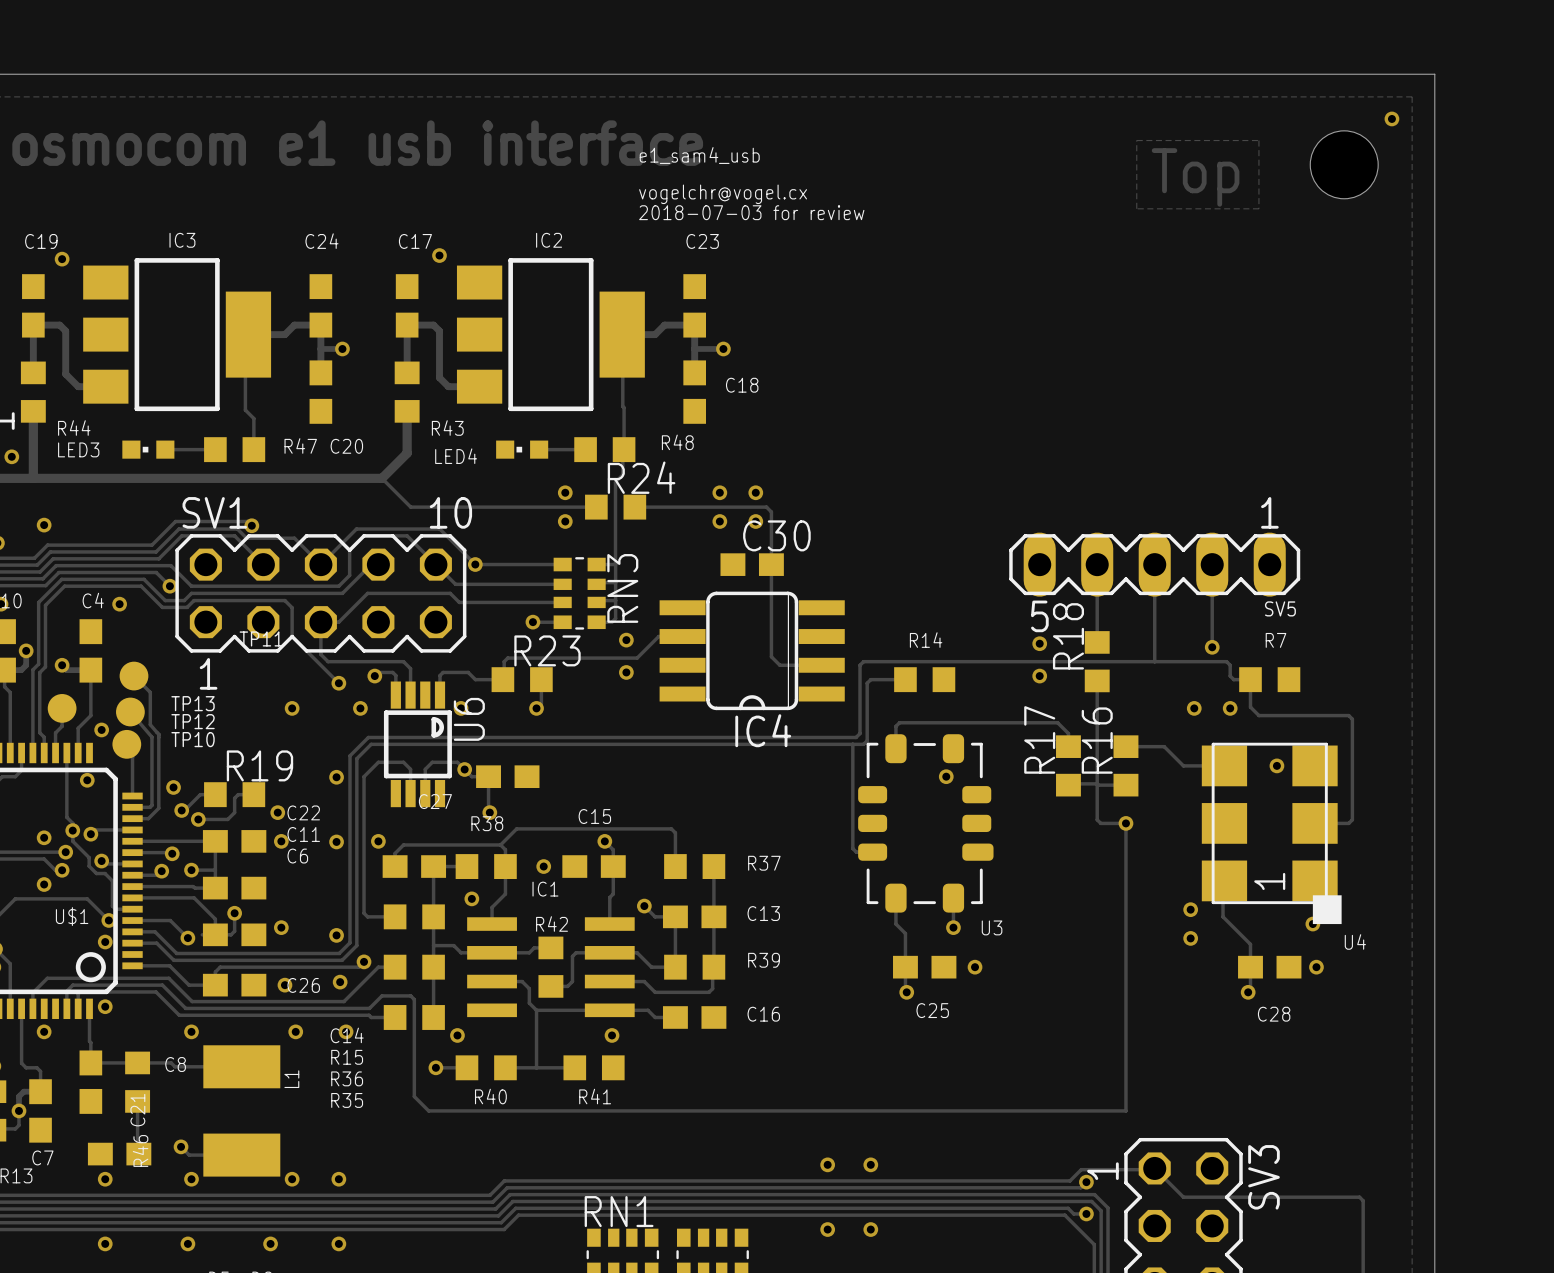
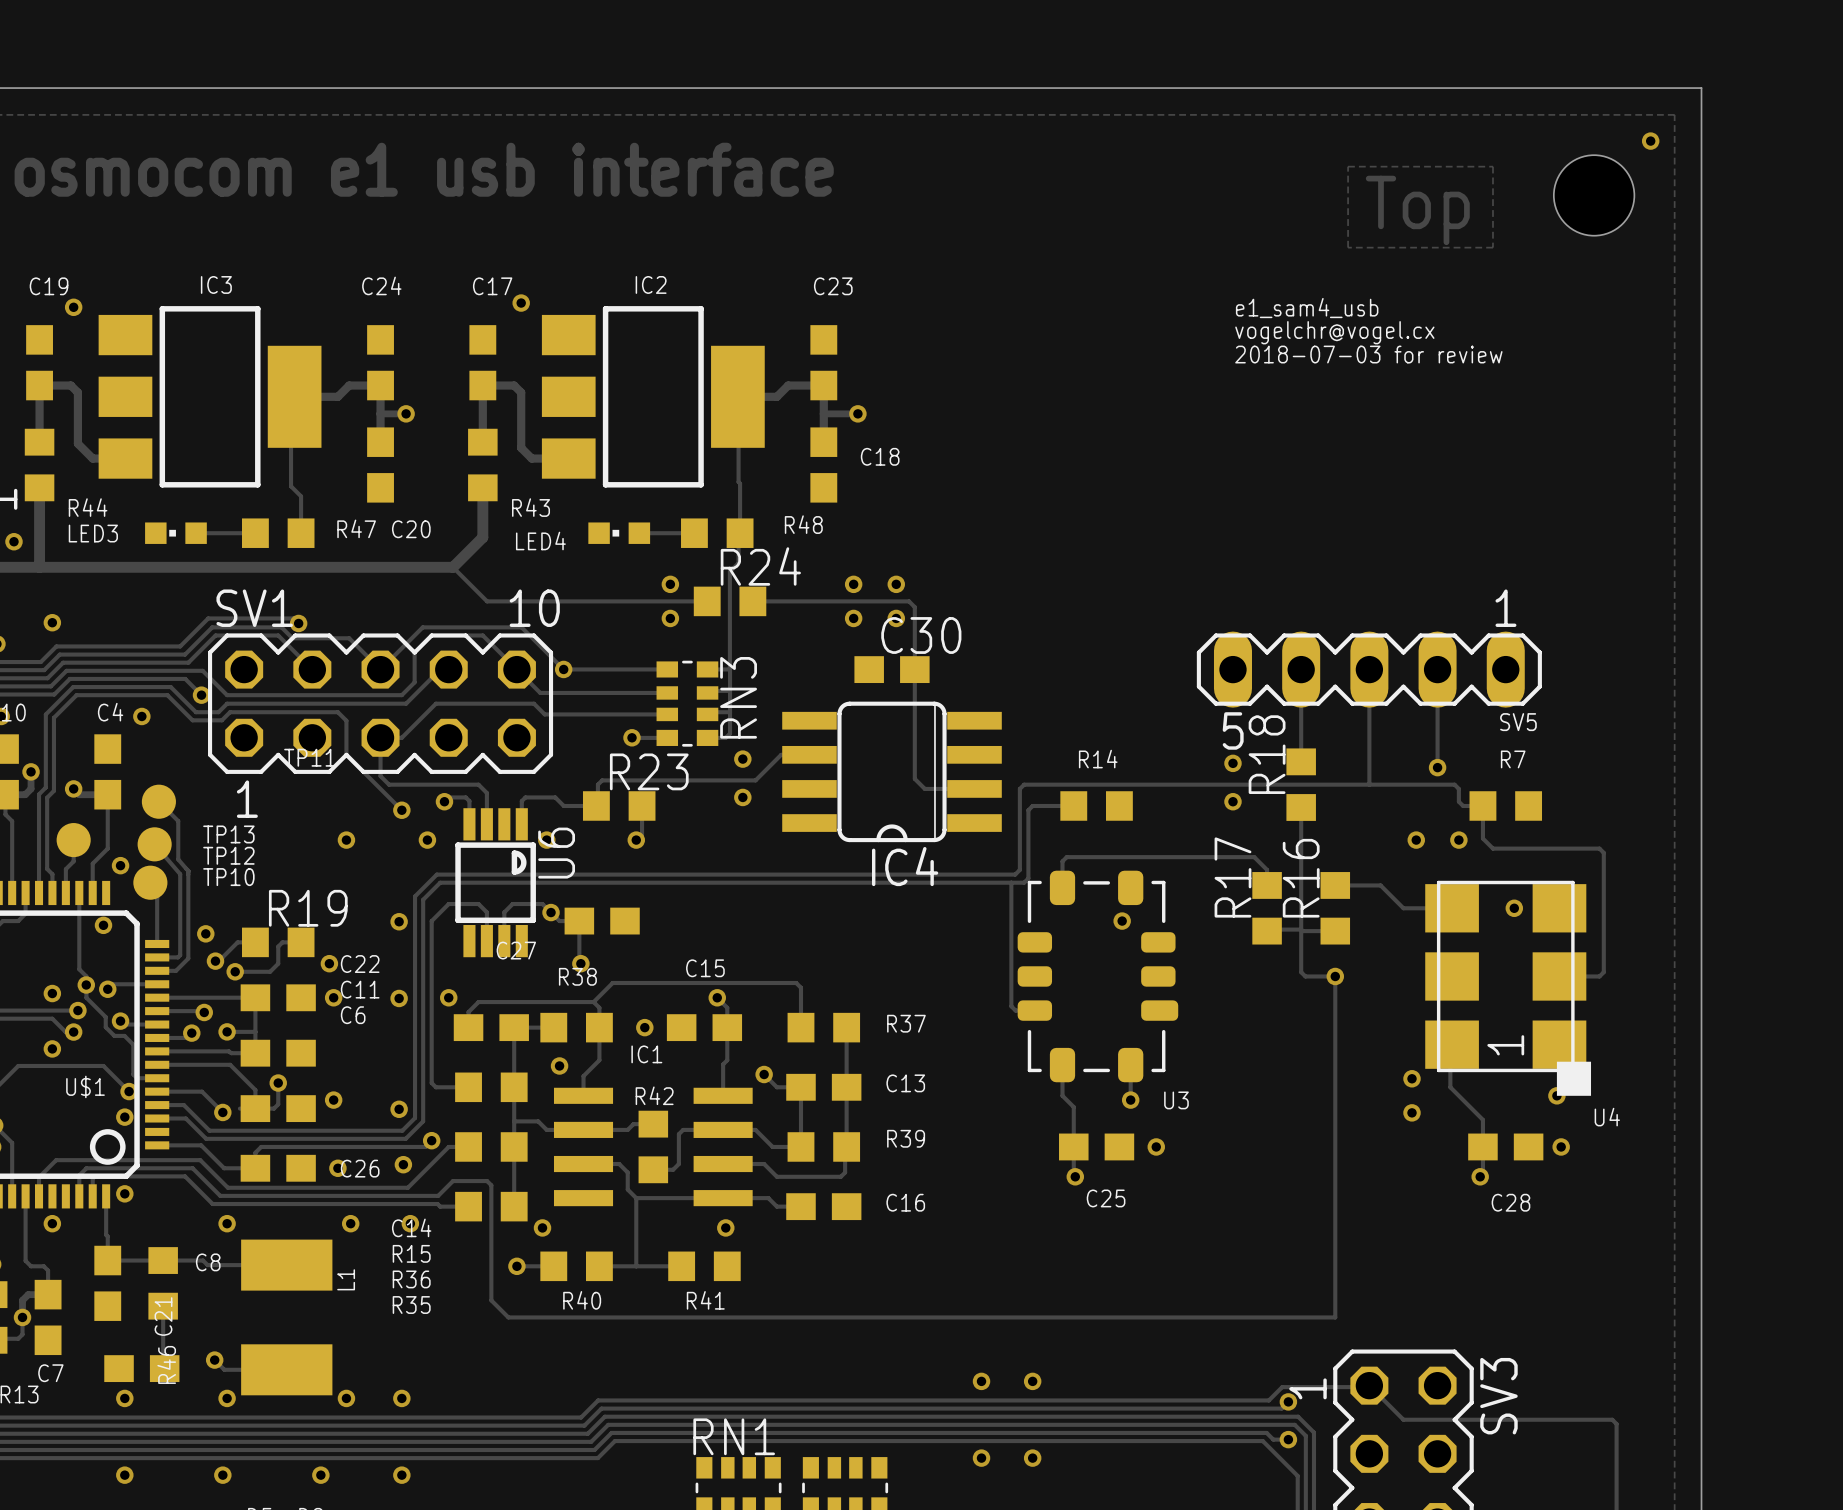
text position: e1_sam4_usb (699, 155) -> e1_sam4_usb (1307, 308)
text position: vogelchr@vogel.cx (723, 194) -> vogelchr@vogel.cx (1334, 332)
text position: 2018-07-03 for review (751, 212) -> 2018-07-03 for review (1368, 354)

